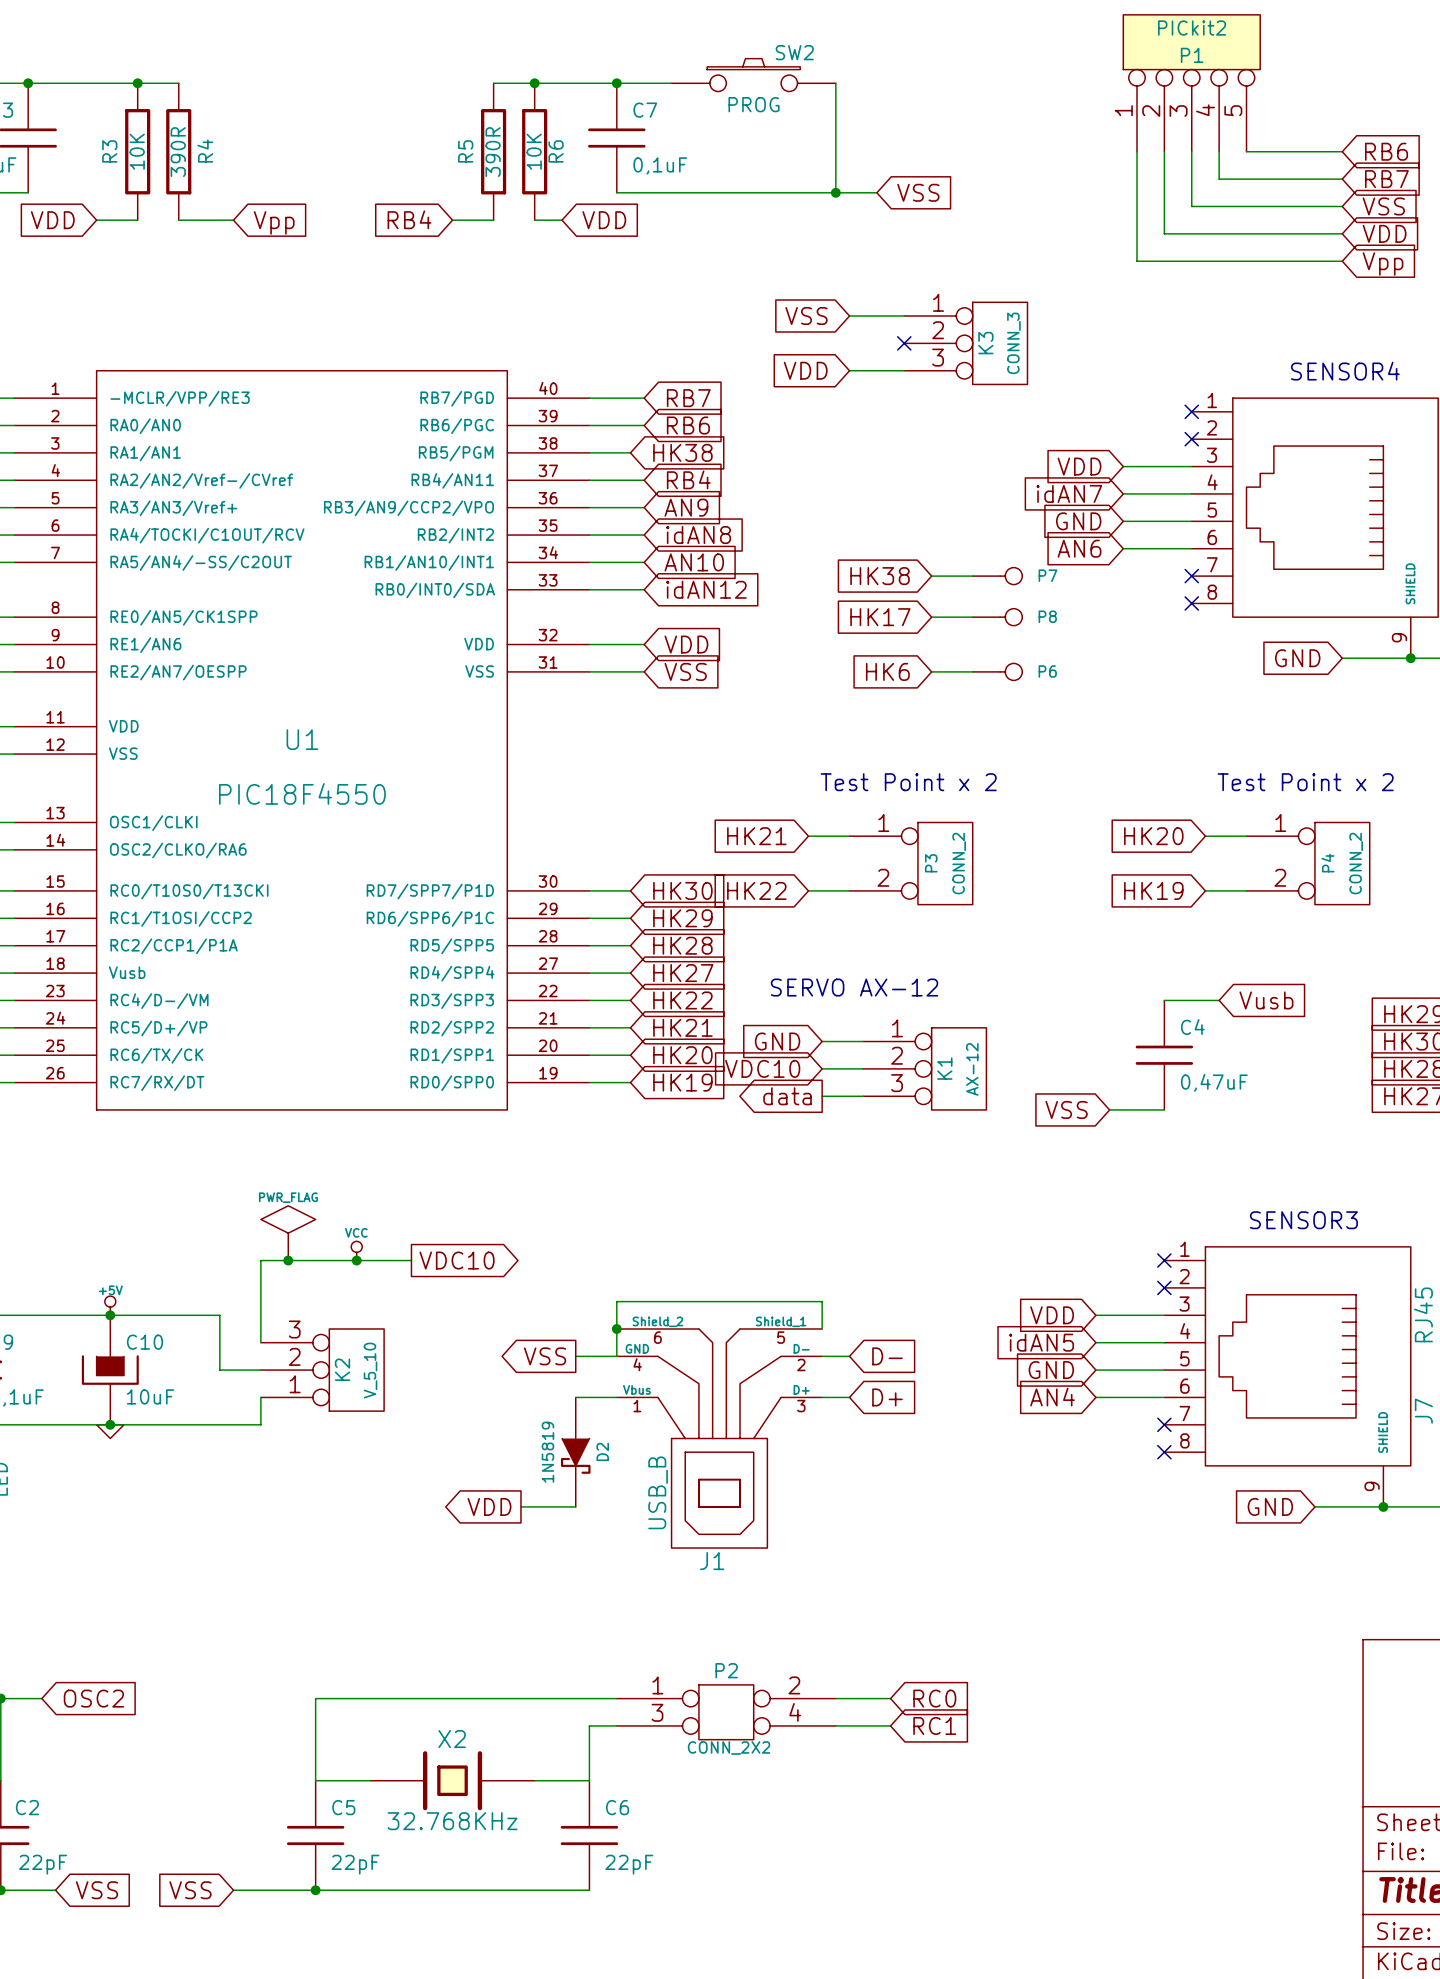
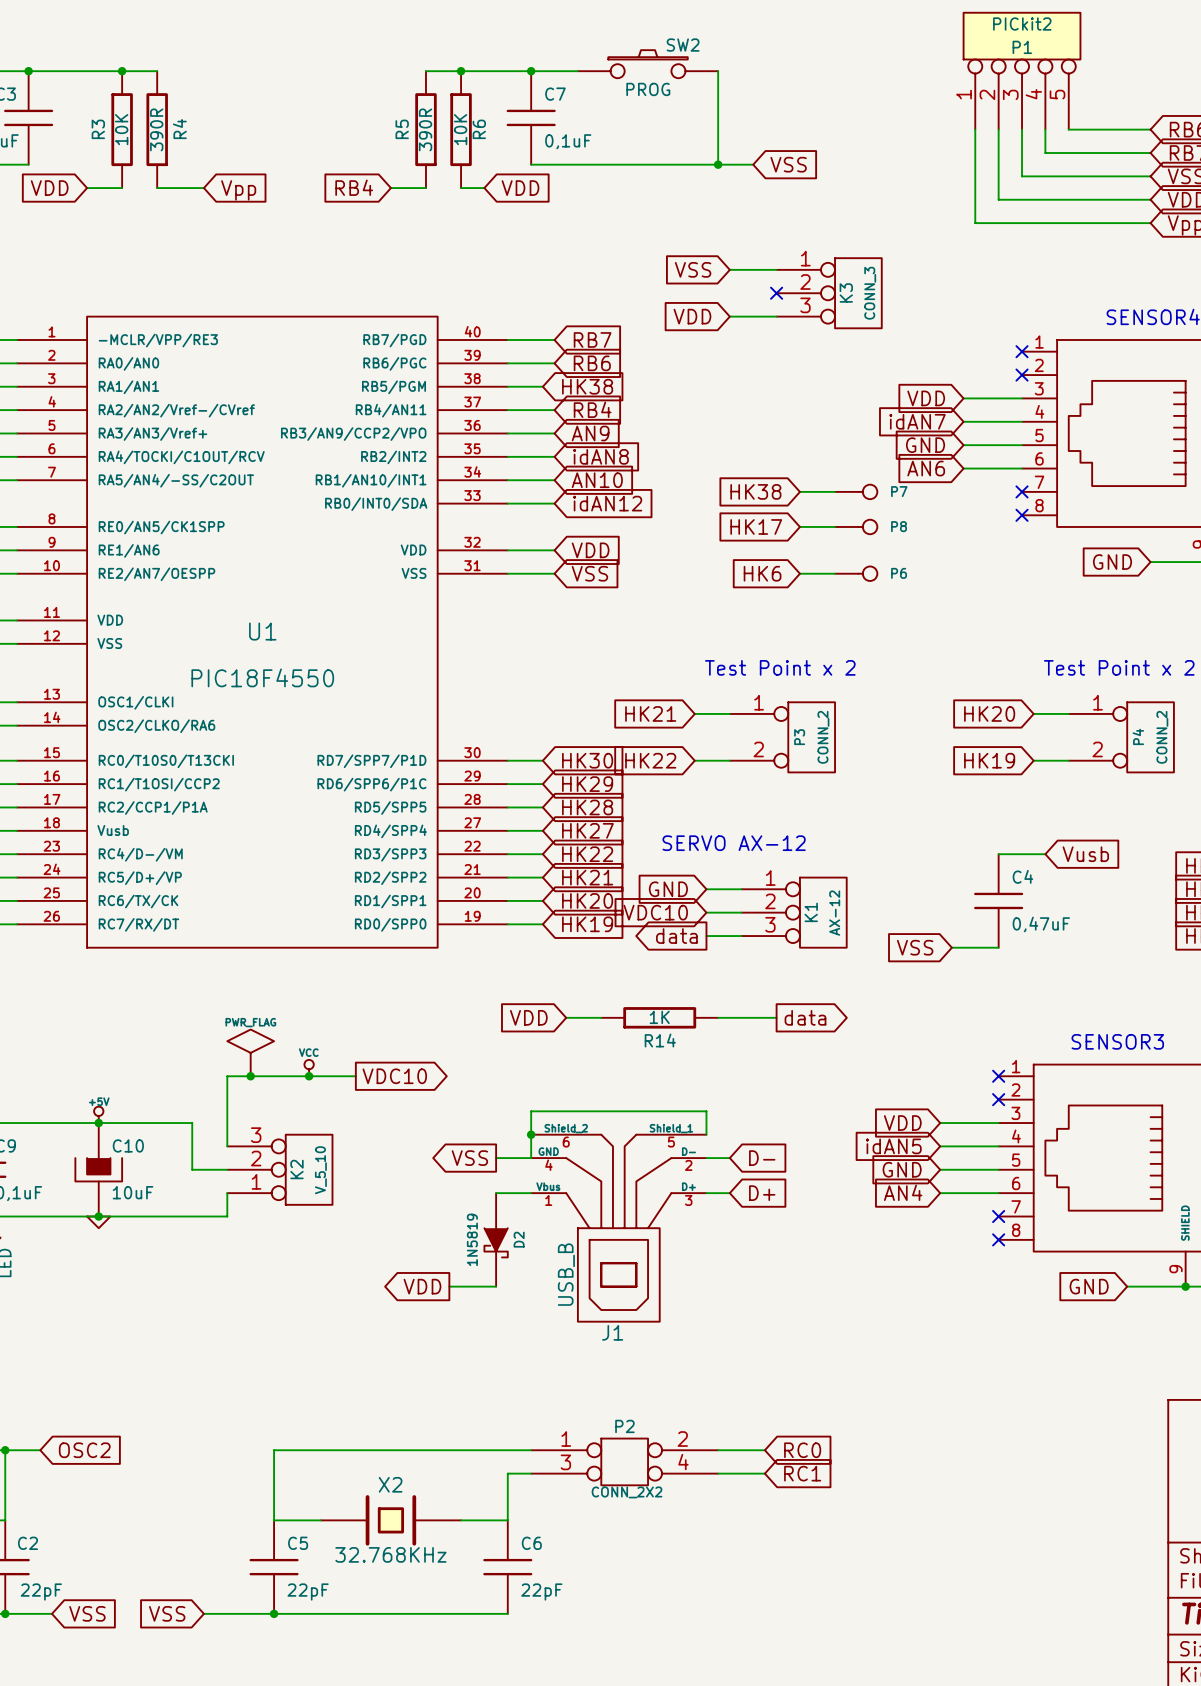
global label: none -> VDD (528, 1017)
wire: none -> (566, 1017) (601, 1017)
R14: none -> 1K (659, 1017)
wire: none -> (718, 1017) (776, 1017)
global label: none -> data (805, 1017)

